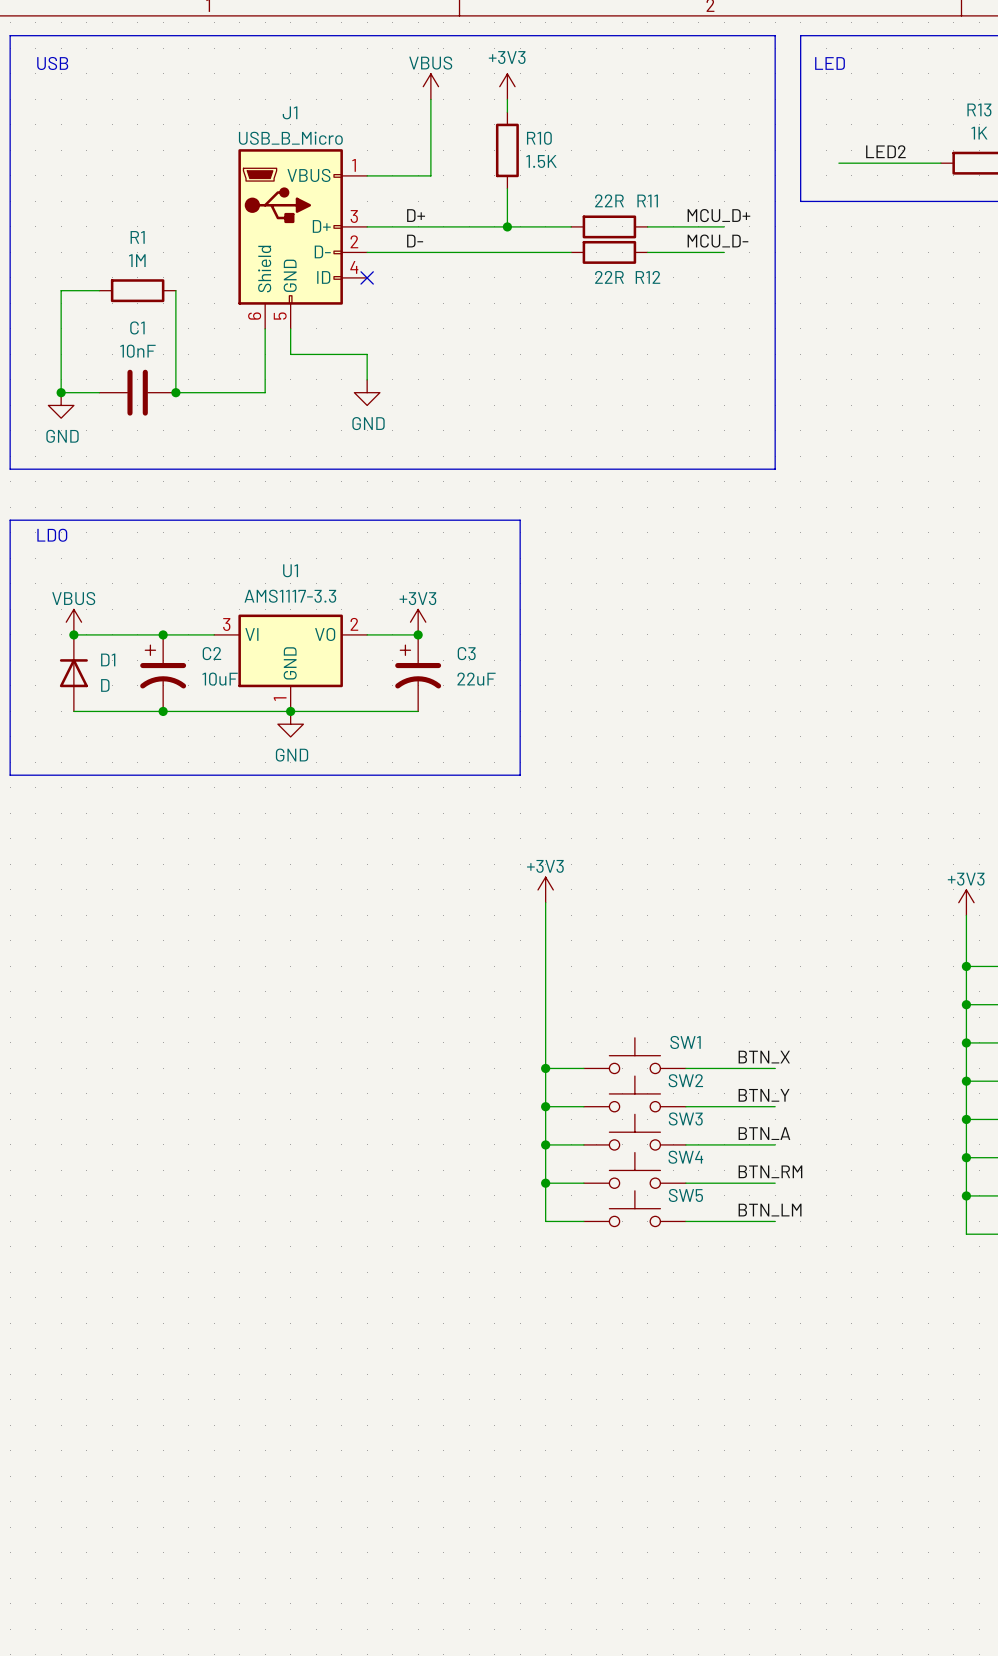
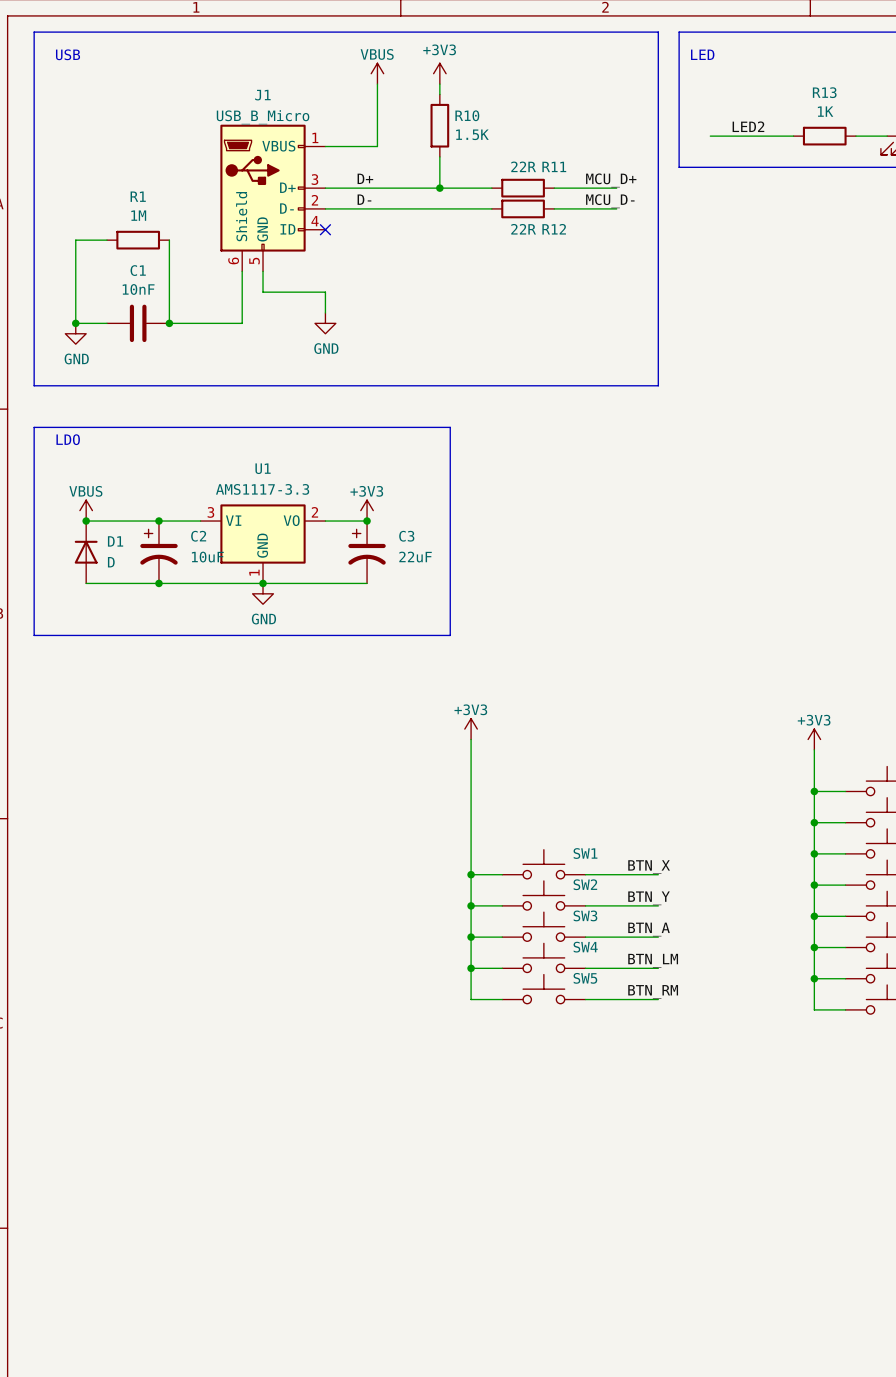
label: BTN_RM (770, 1171) -> BTN_LM (653, 960)
label: BTN_LM (770, 1210) -> BTN_RM (653, 991)

